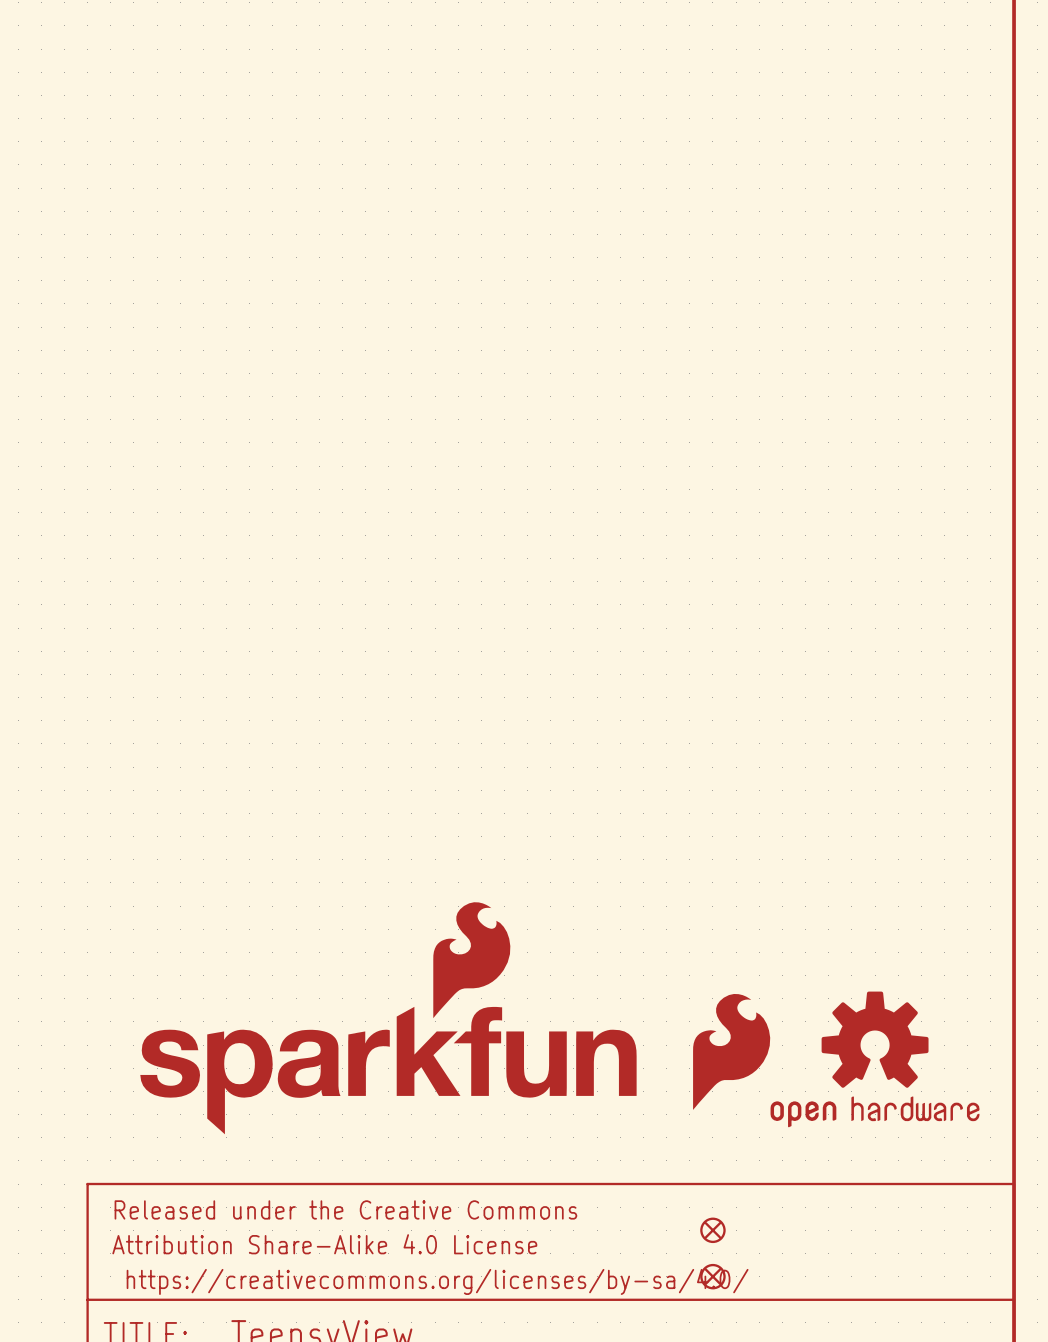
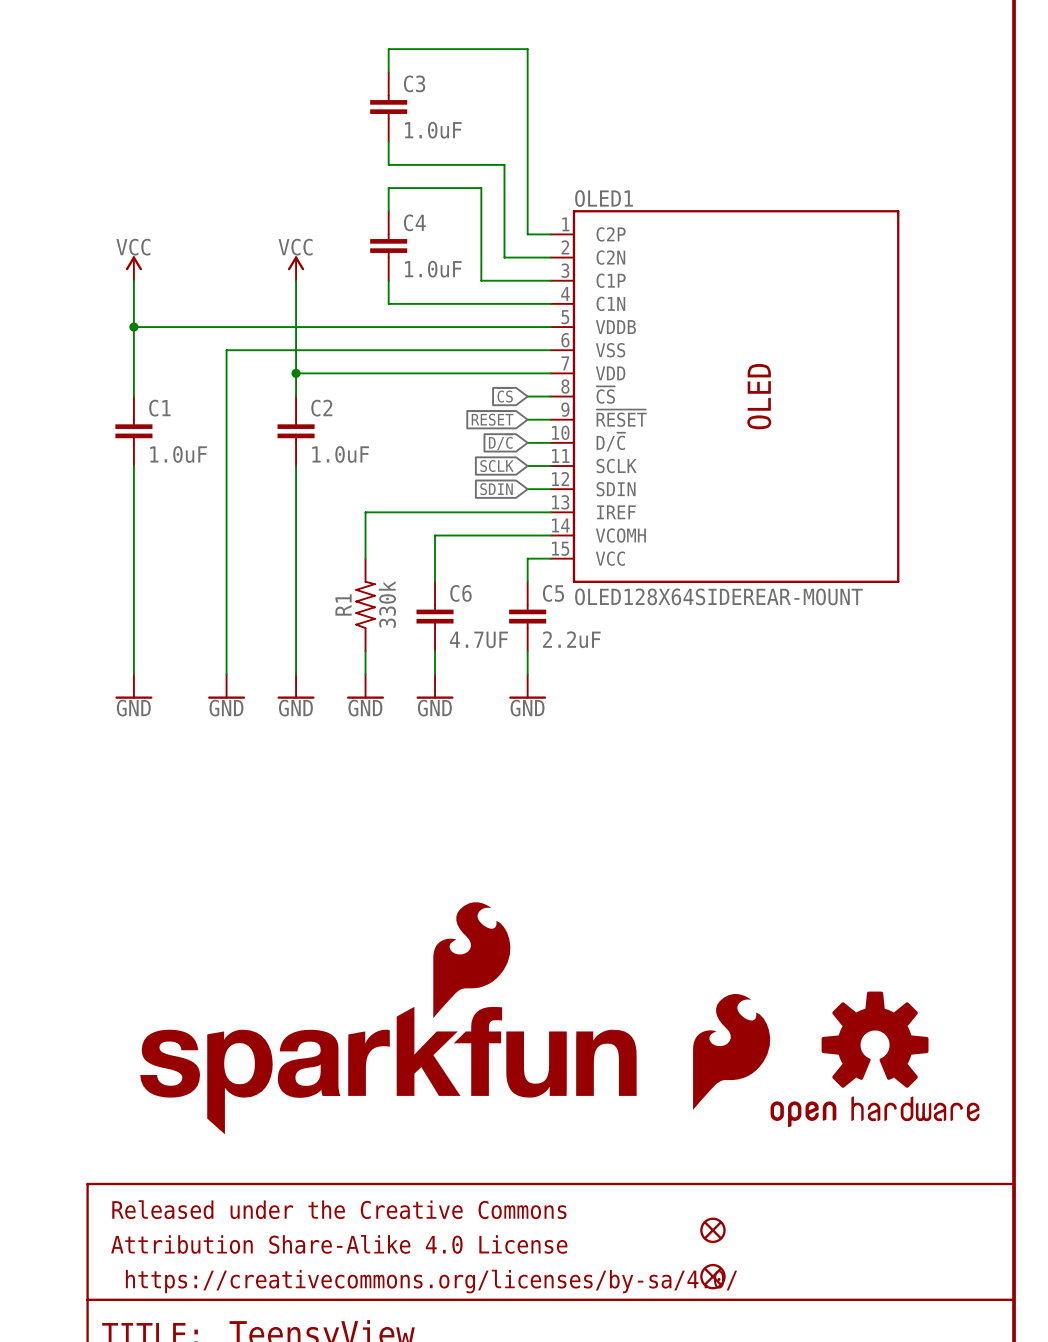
wire: none -> (388, 72) (388, 49) (527, 49) (527, 234) (550, 234)
C3: none -> 1.0uF (388, 107)
wire: none -> (388, 141) (388, 164) (504, 164) (504, 257) (550, 257)
wire: none -> (388, 211) (388, 188) (481, 188) (481, 280) (550, 280)
C4: none -> 1.0uF (388, 245)
power symbol: none -> VCC (133, 268)
power symbol: none -> VCC (296, 268)
wire: none -> (133, 280) (133, 396)
wire: none -> (296, 280) (296, 396)
wire: none -> (388, 280) (388, 303) (550, 303)
wire: none -> (133, 327) (550, 327)
junction: none -> (133, 327)
wire: none -> (550, 350) (226, 350) (226, 674)
wire: none -> (296, 373) (550, 373)
junction: none -> (296, 373)
global label: none -> ~{CS} (505, 395)
wire: none -> (527, 396) (550, 396)
OLED1: none -> OLED128X64SIDEREAR-MOUNT (725, 396)
global label: none -> ~{RESET} (492, 418)
wire: none -> (527, 419) (550, 419)
C1: none -> 1.0uF (133, 431)
C2: none -> 1.0uF (296, 431)
global label: none -> D/~{C} (500, 442)
wire: none -> (527, 442) (550, 442)
wire: none -> (133, 466) (133, 674)
wire: none -> (296, 466) (296, 674)
global label: none -> SCLK (497, 466)
wire: none -> (527, 466) (550, 466)
global label: none -> SDIN (496, 489)
wire: none -> (527, 489) (550, 489)
wire: none -> (550, 512) (365, 512) (365, 558)
wire: none -> (550, 535) (435, 535) (435, 581)
wire: none -> (550, 558) (527, 558) (527, 581)
R1: none -> 330k (365, 604)
C6: none -> 4.7UF (435, 616)
C5: none -> 2.2uF (527, 616)
wire: none -> (365, 651) (365, 674)
wire: none -> (435, 651) (435, 674)
wire: none -> (527, 651) (527, 674)
power symbol: none -> GND (133, 686)
power symbol: none -> GND (226, 686)
power symbol: none -> GND (296, 686)
power symbol: none -> GND (365, 686)
power symbol: none -> GND (435, 686)
power symbol: none -> GND (527, 686)

